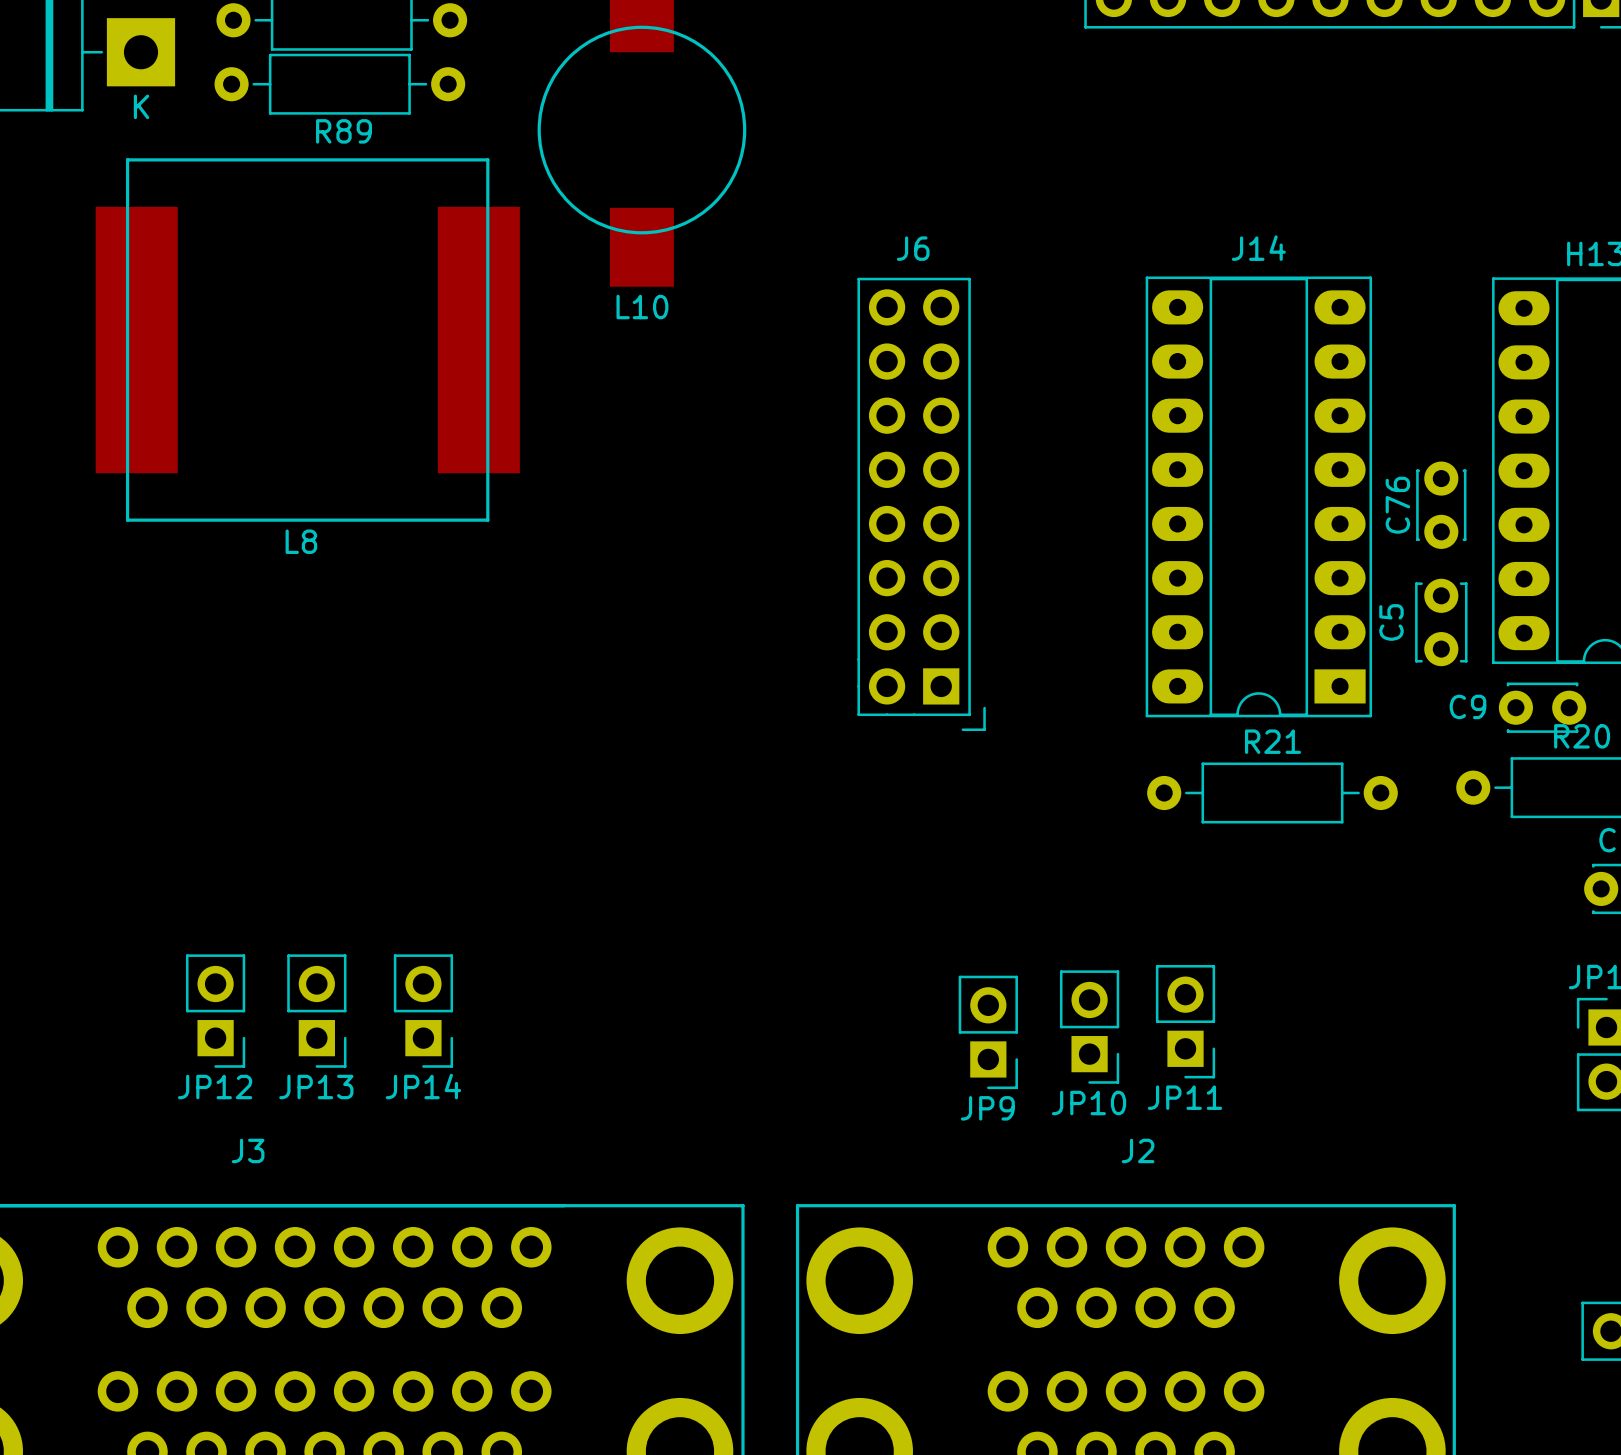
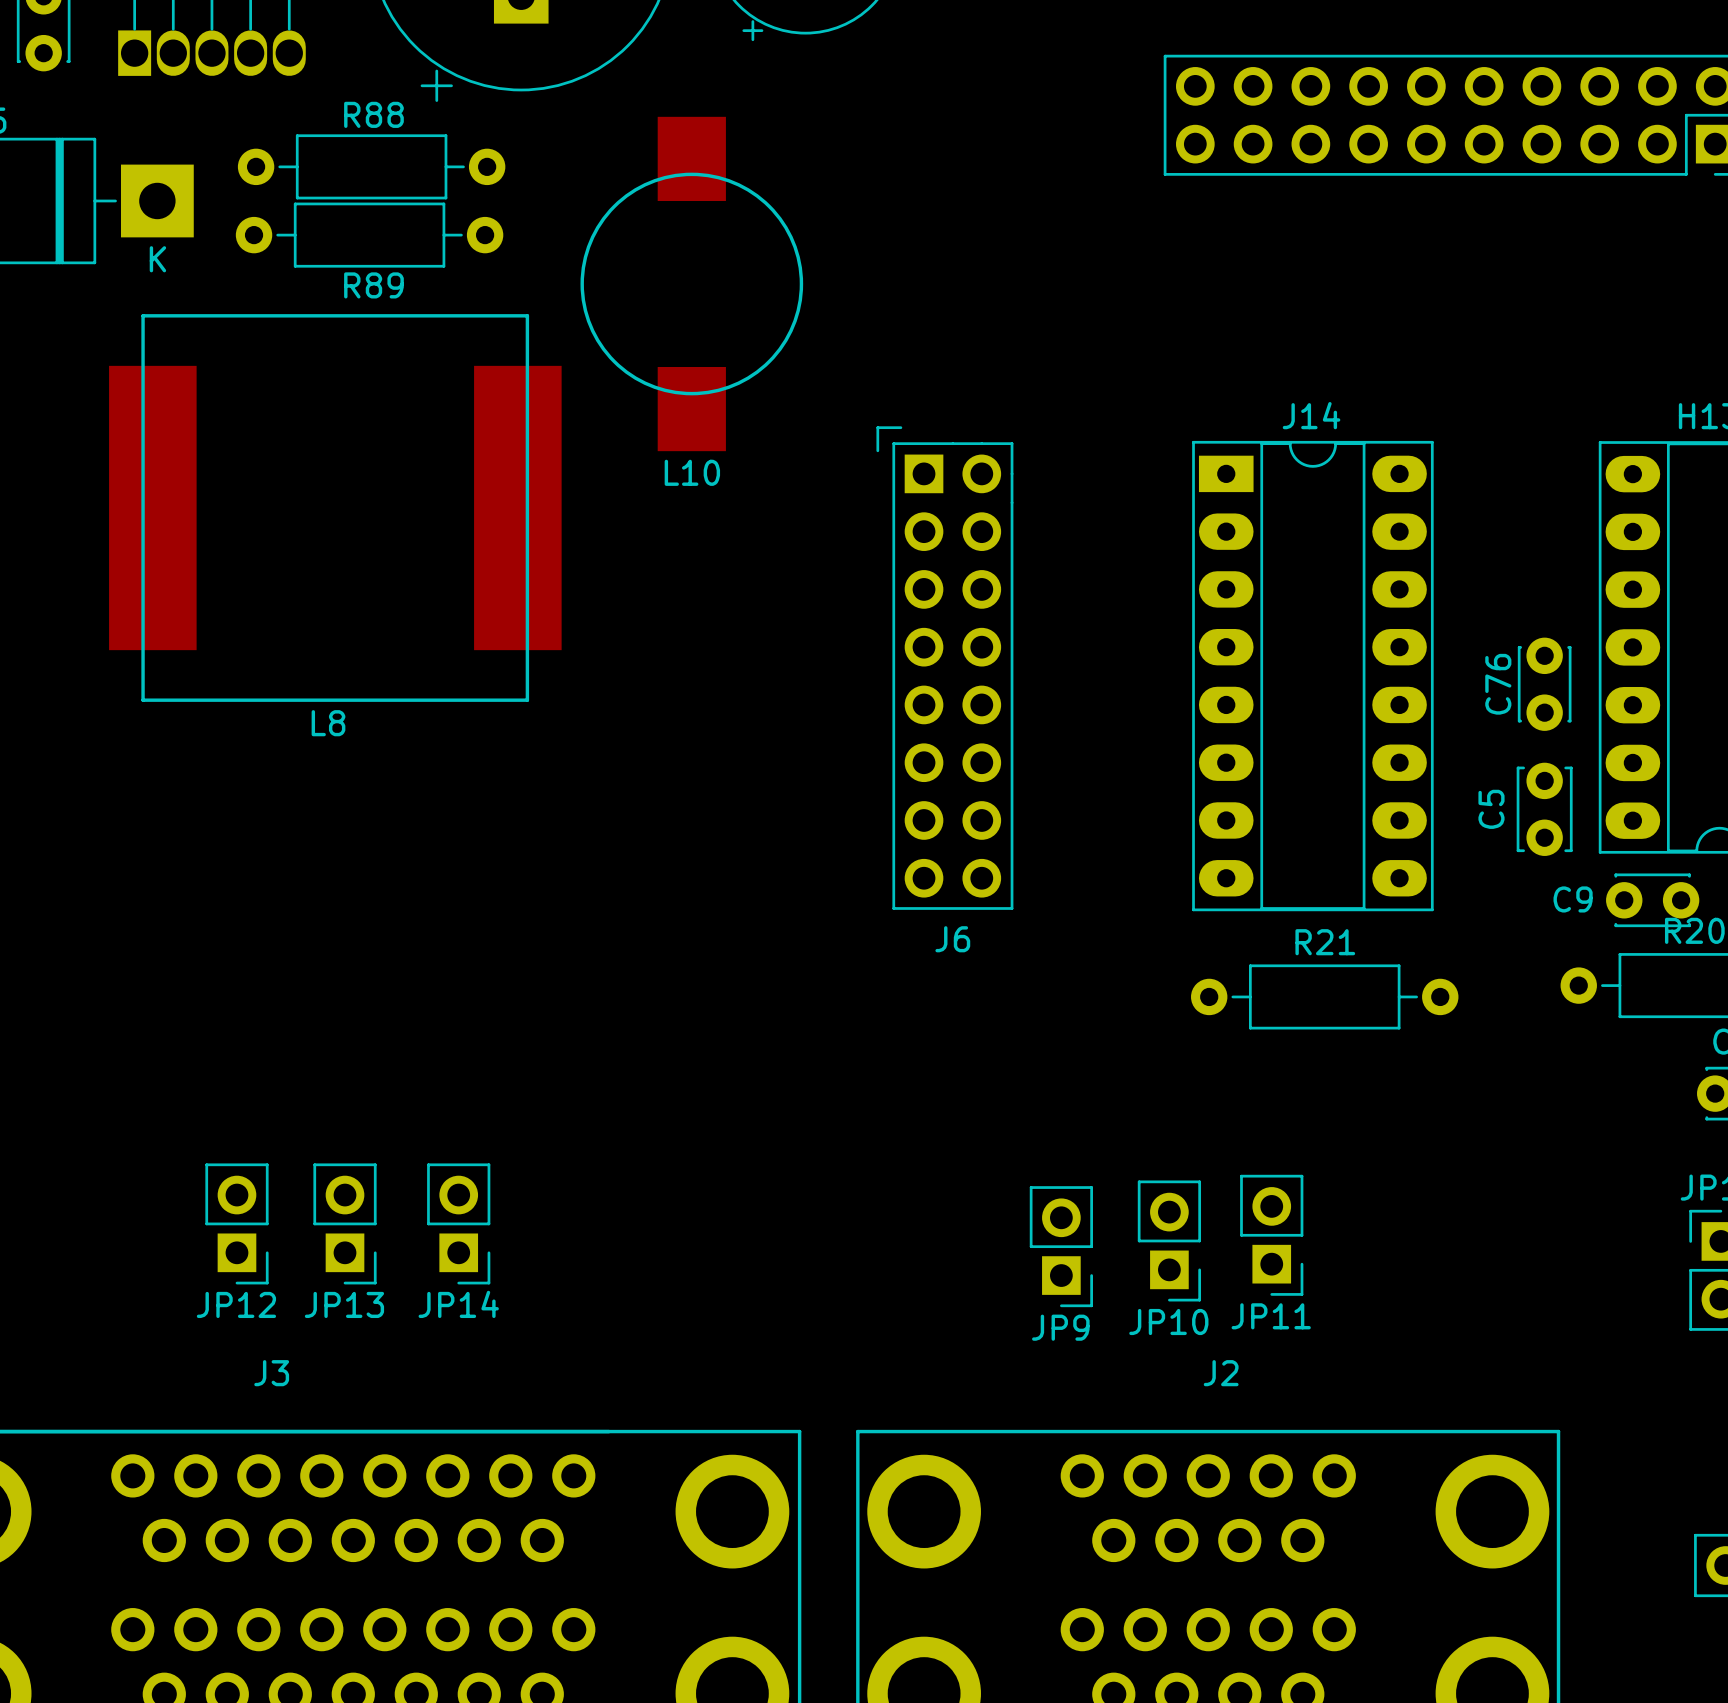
J14 rotation: 0° (1258, 496) -> 180° (1312, 676)
J6 rotation: 0° (921, 504) -> 180° (944, 668)
R21 position: (1272, 792) -> (1324, 996)

